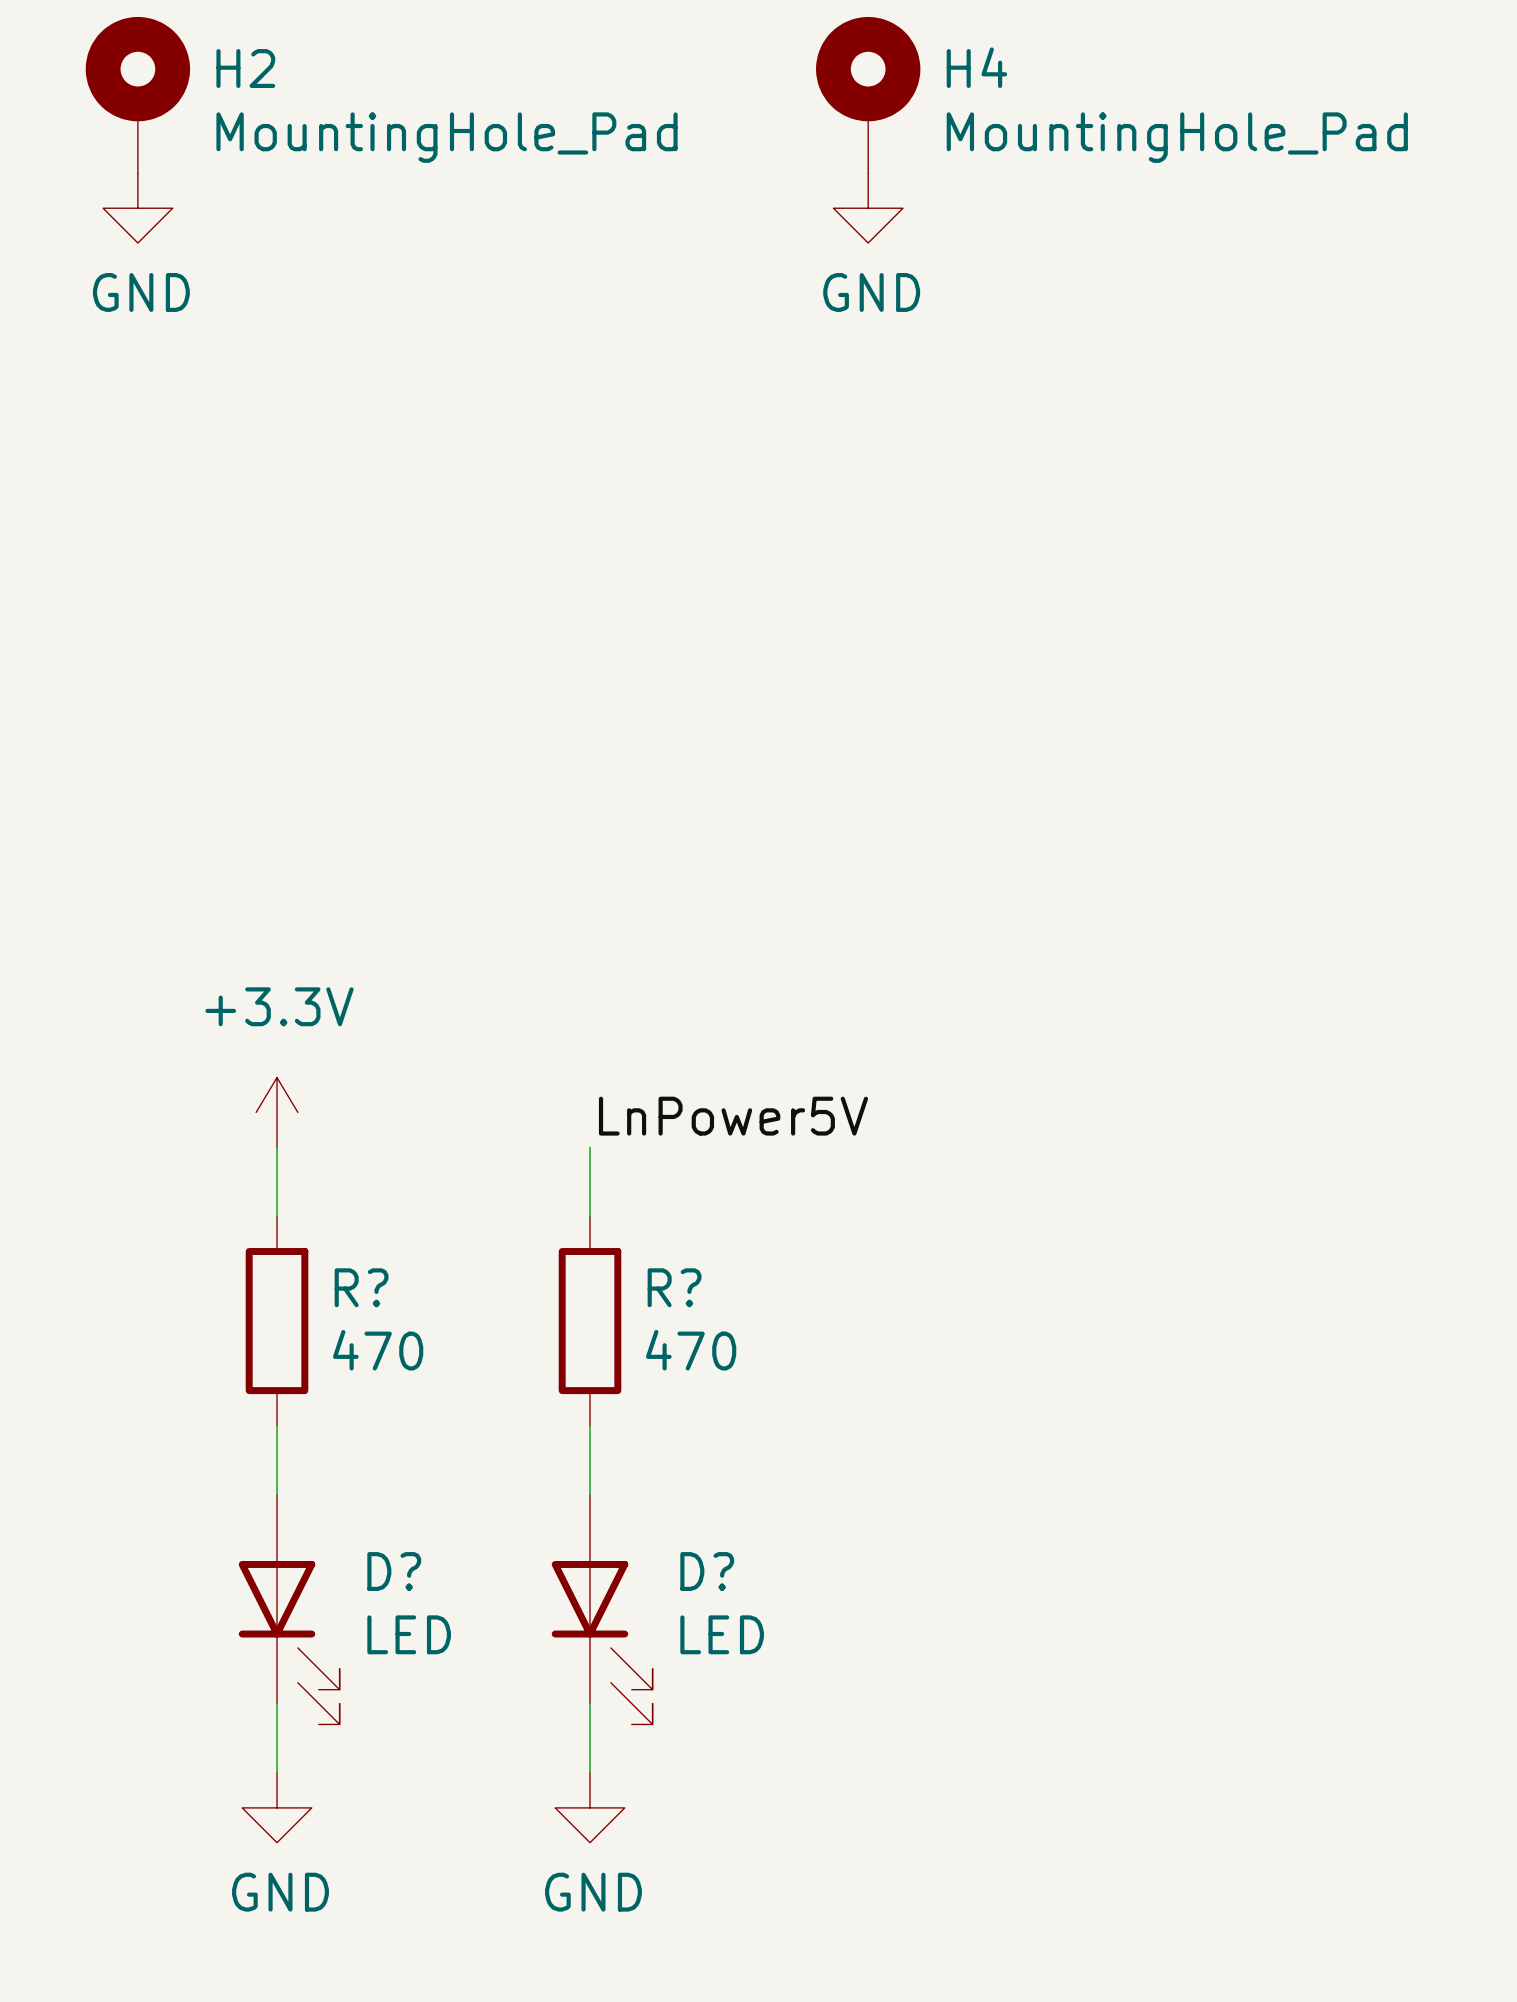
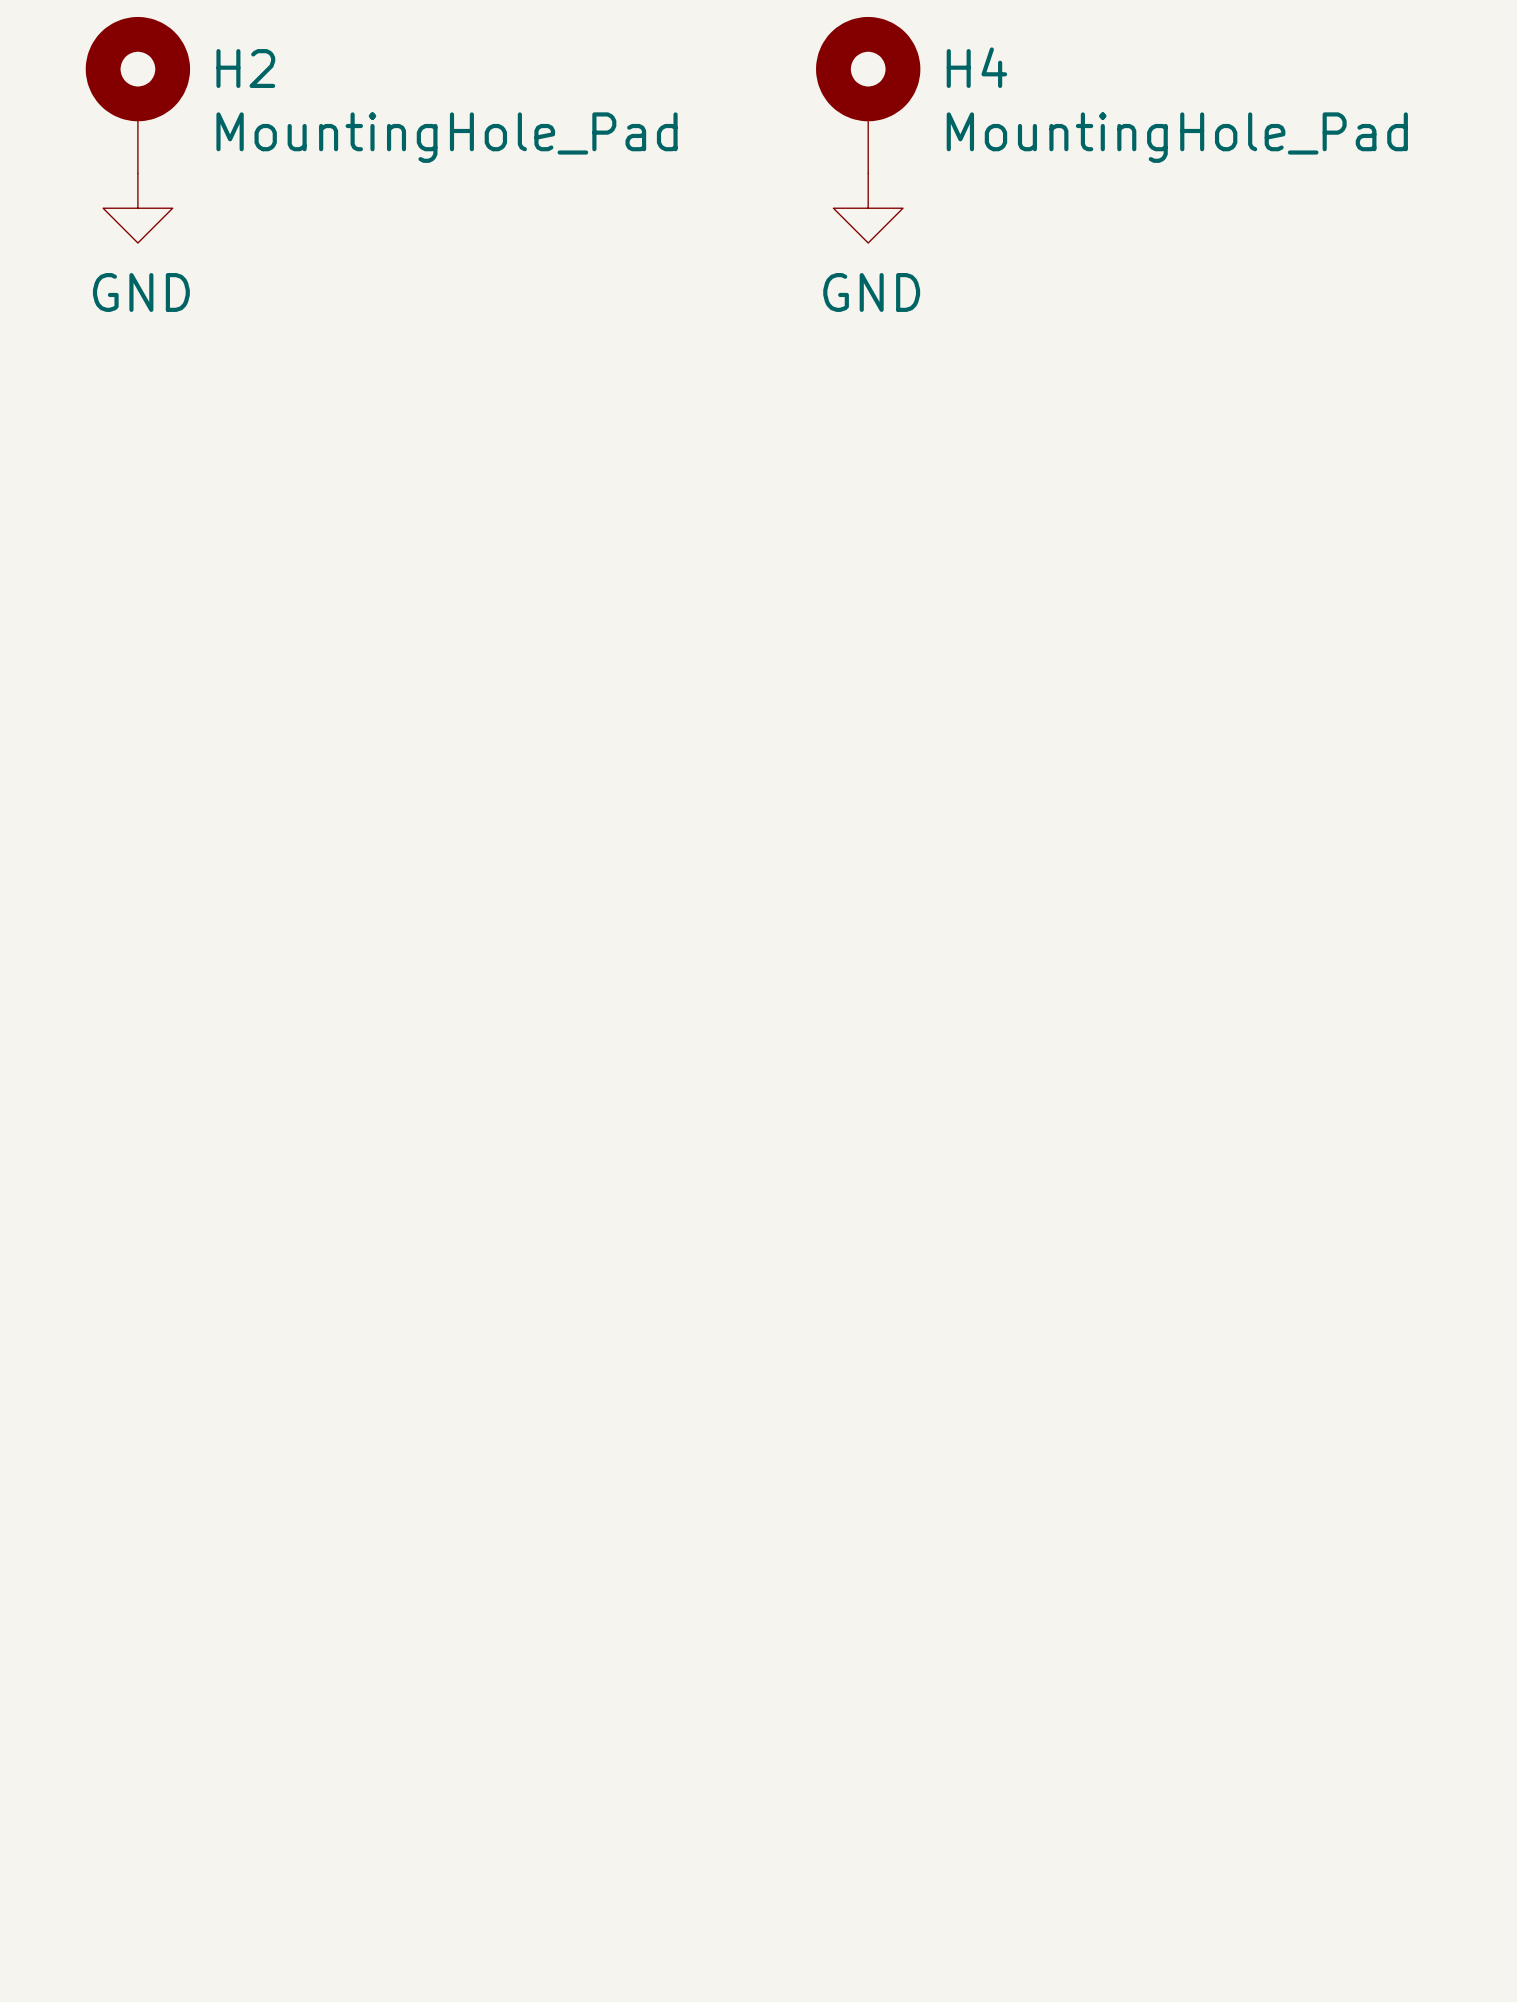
power symbol: +3.3V (277, 1112) -> none
label: LnPower5V (733, 1116) -> none
wire: (277, 1147) (277, 1216) -> none
wire: (589, 1147) (589, 1216) -> none
R?: 470 (277, 1321) -> none
R?: 470 (589, 1321) -> none
wire: (277, 1425) (277, 1494) -> none
wire: (589, 1425) (589, 1494) -> none
D?: LED (289, 1609) -> none
D?: LED (602, 1609) -> none
wire: (277, 1703) (277, 1773) -> none
wire: (589, 1703) (589, 1773) -> none
power symbol: GND (277, 1807) -> none
power symbol: GND (589, 1807) -> none

